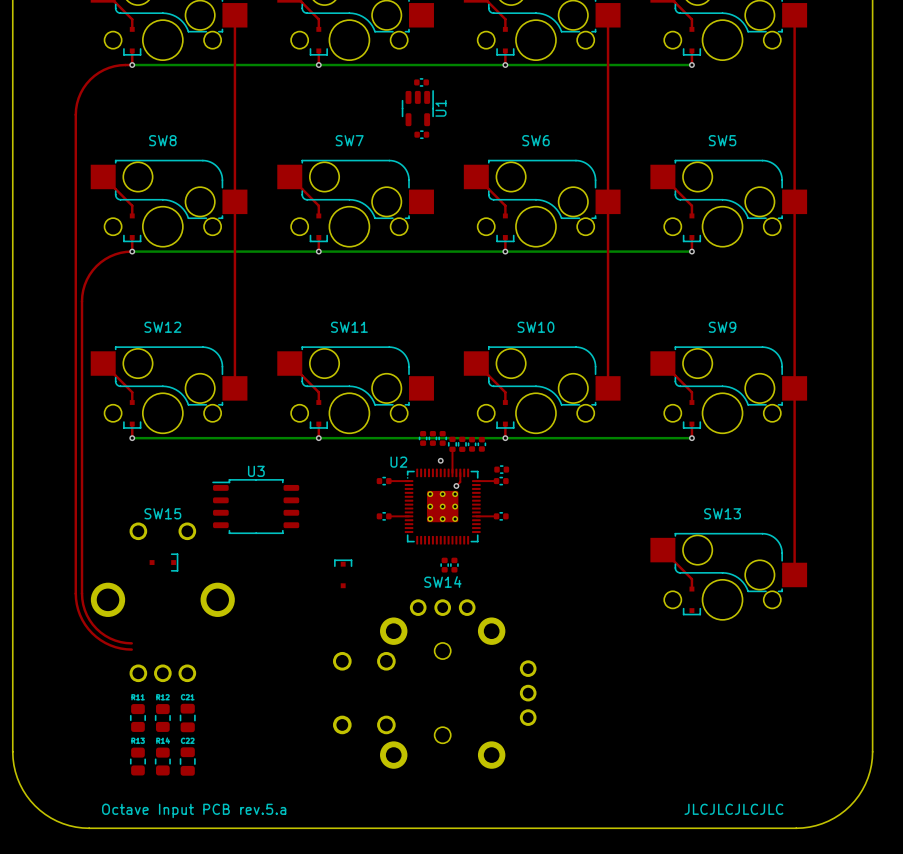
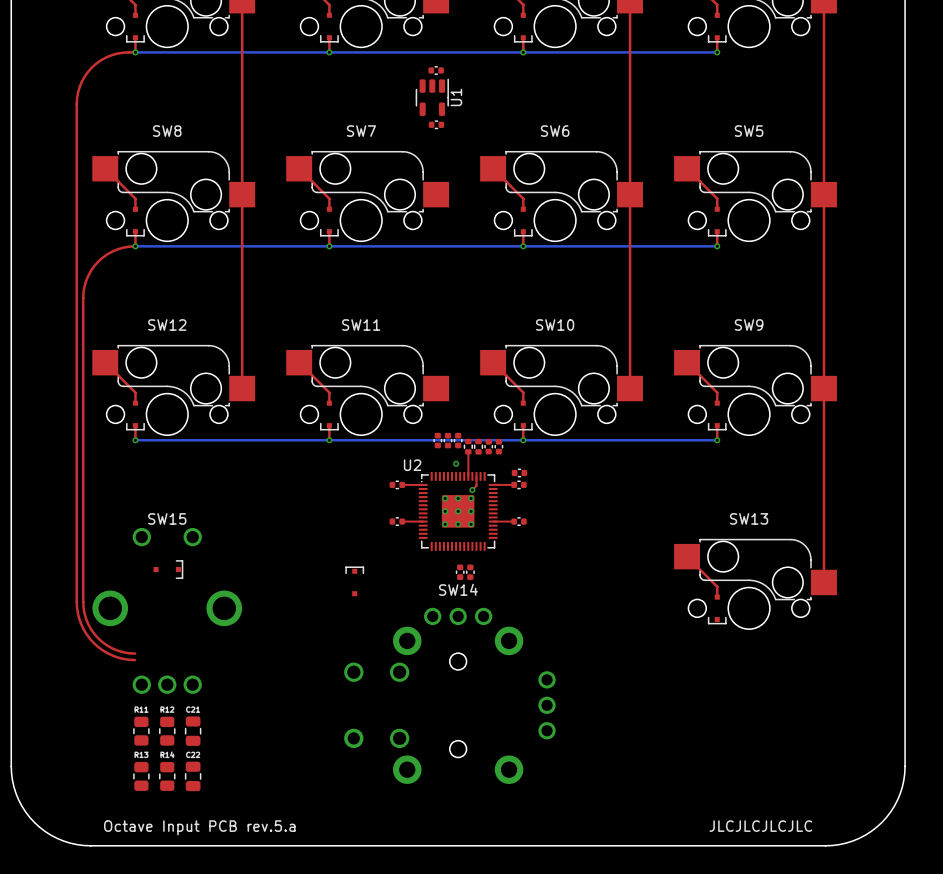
U3: (255, 506) -> none

